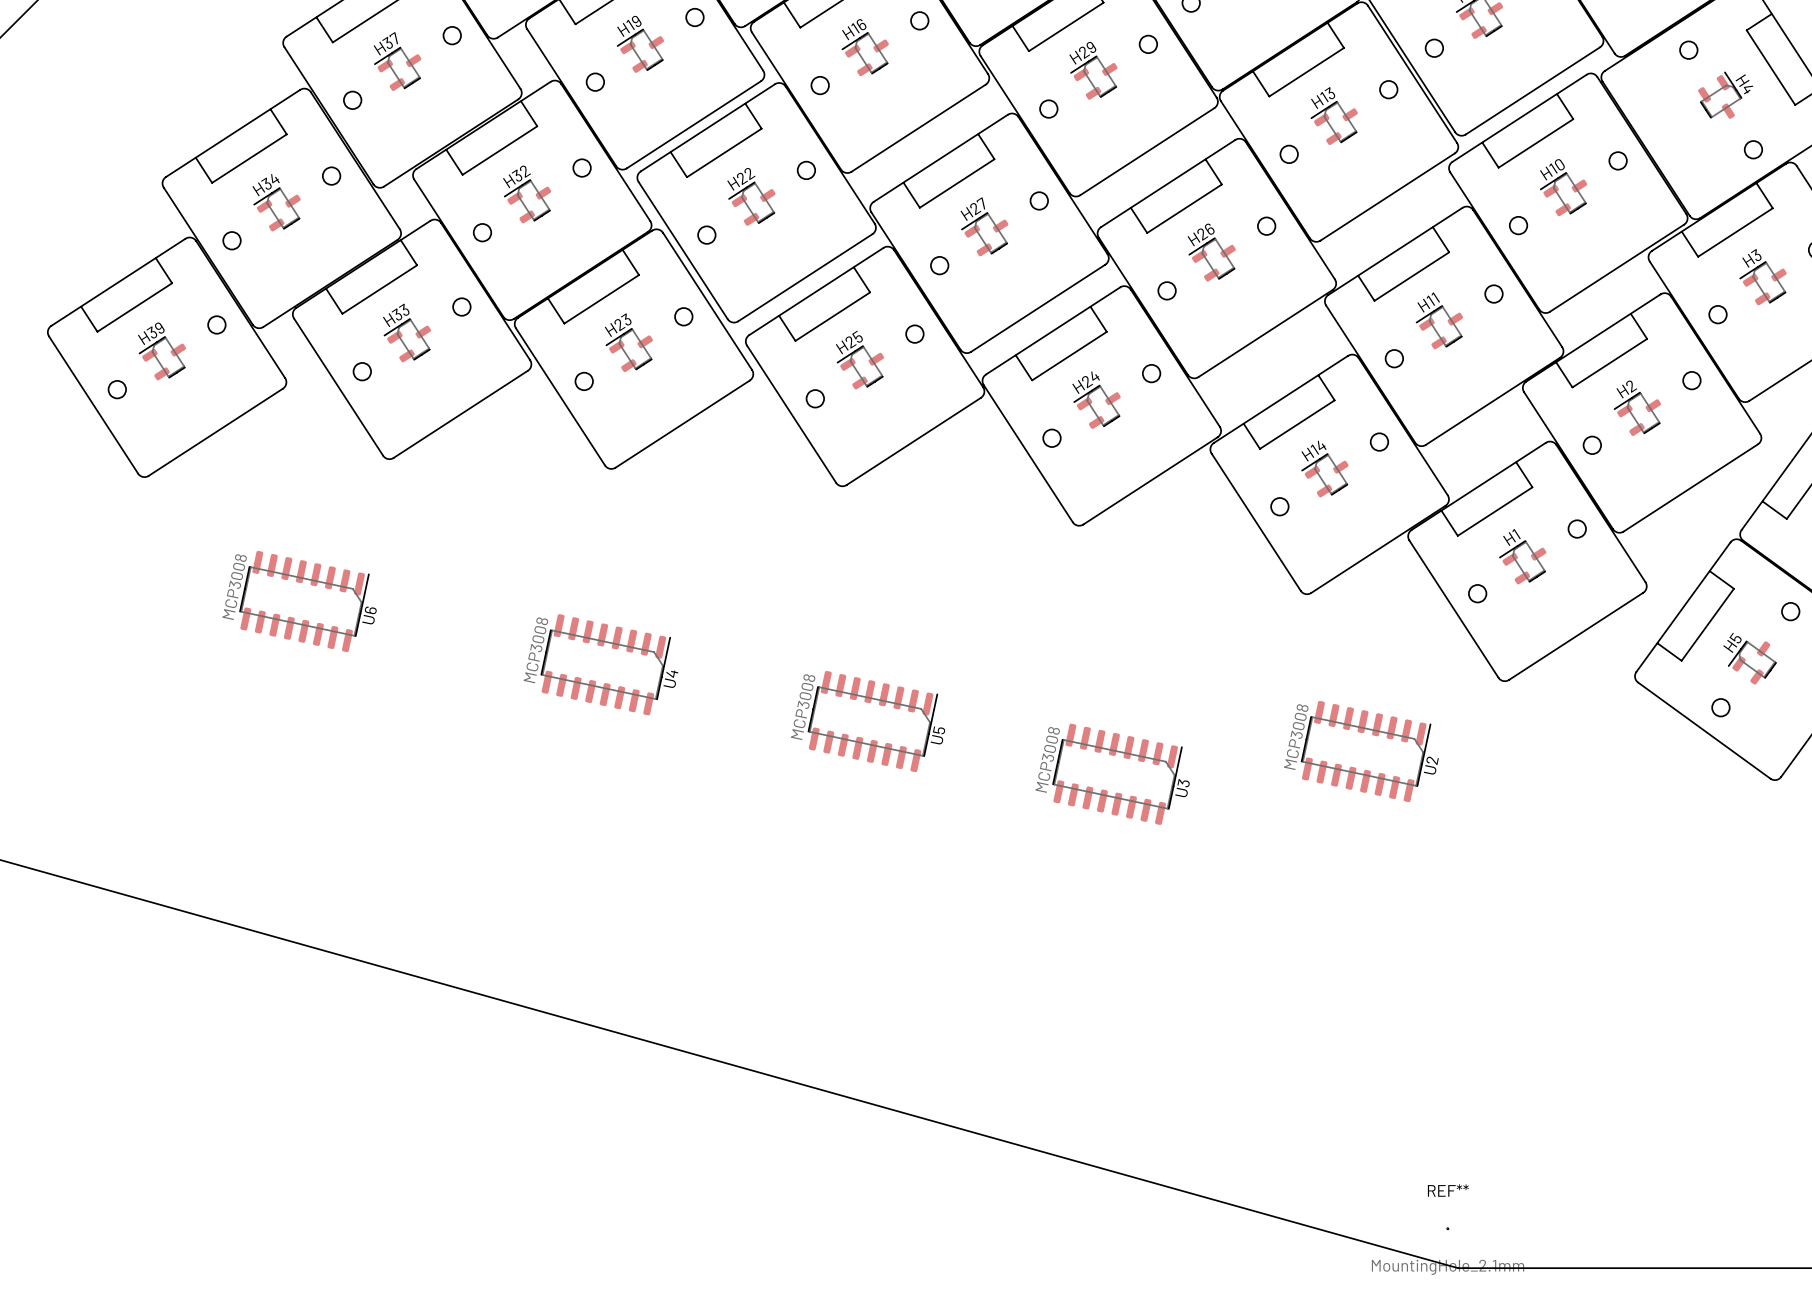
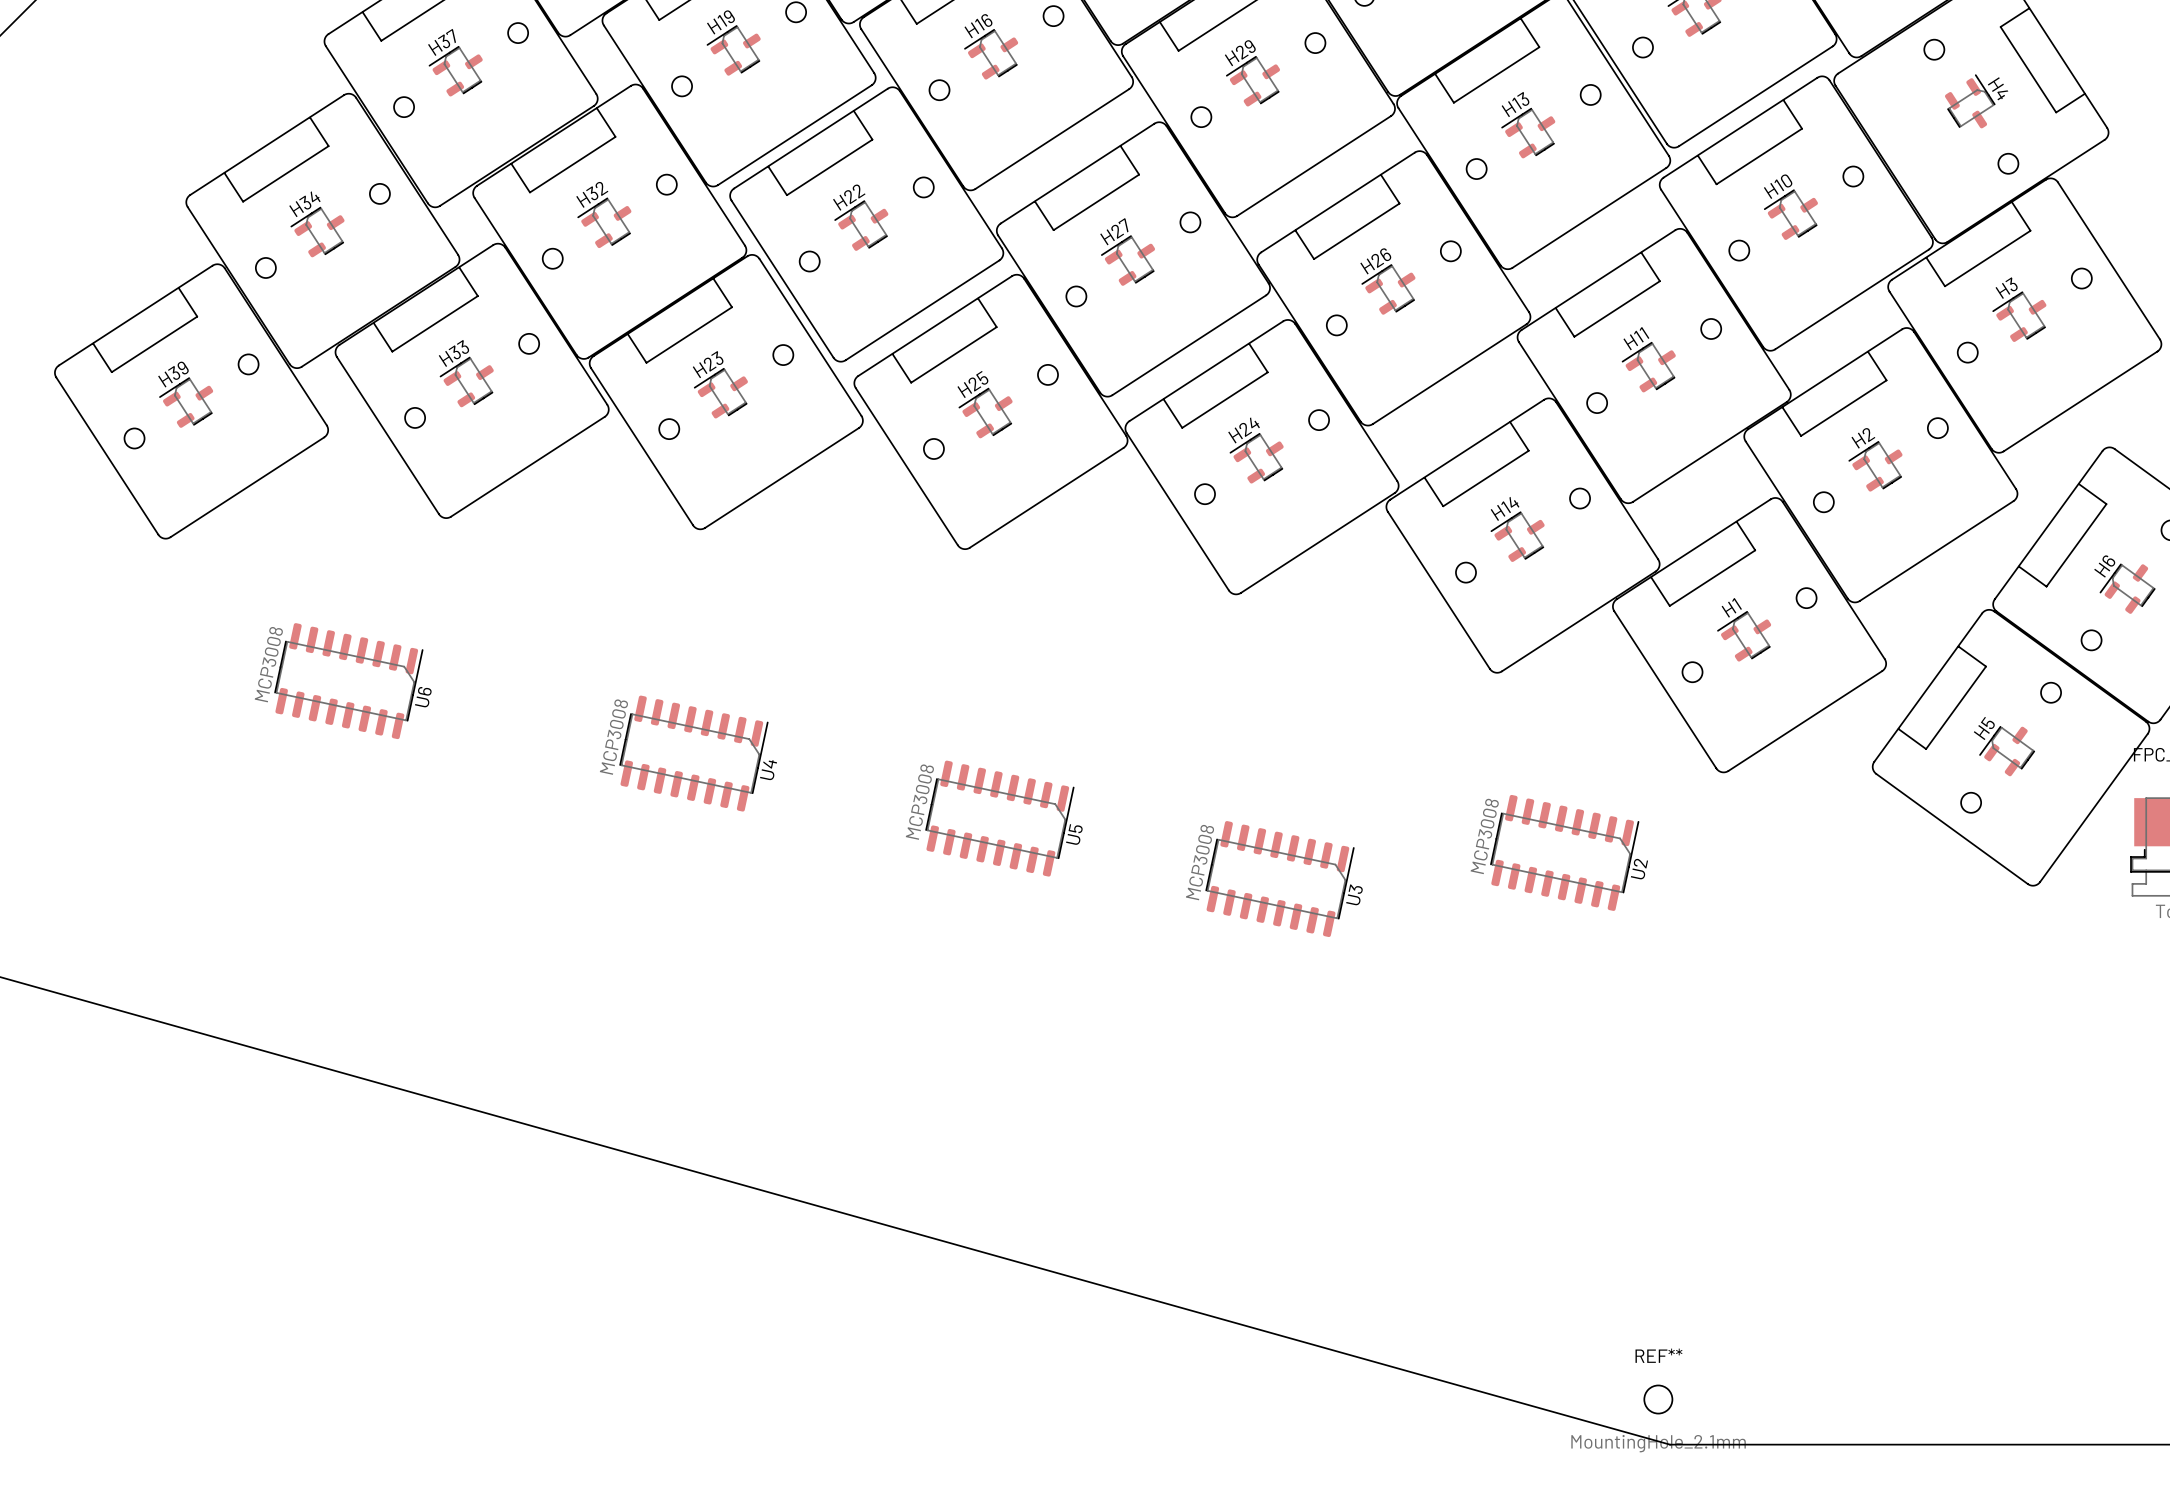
REF** footprint: [1447, 1228, 1449, 1230] -> [1644, 1385, 1673, 1414]

